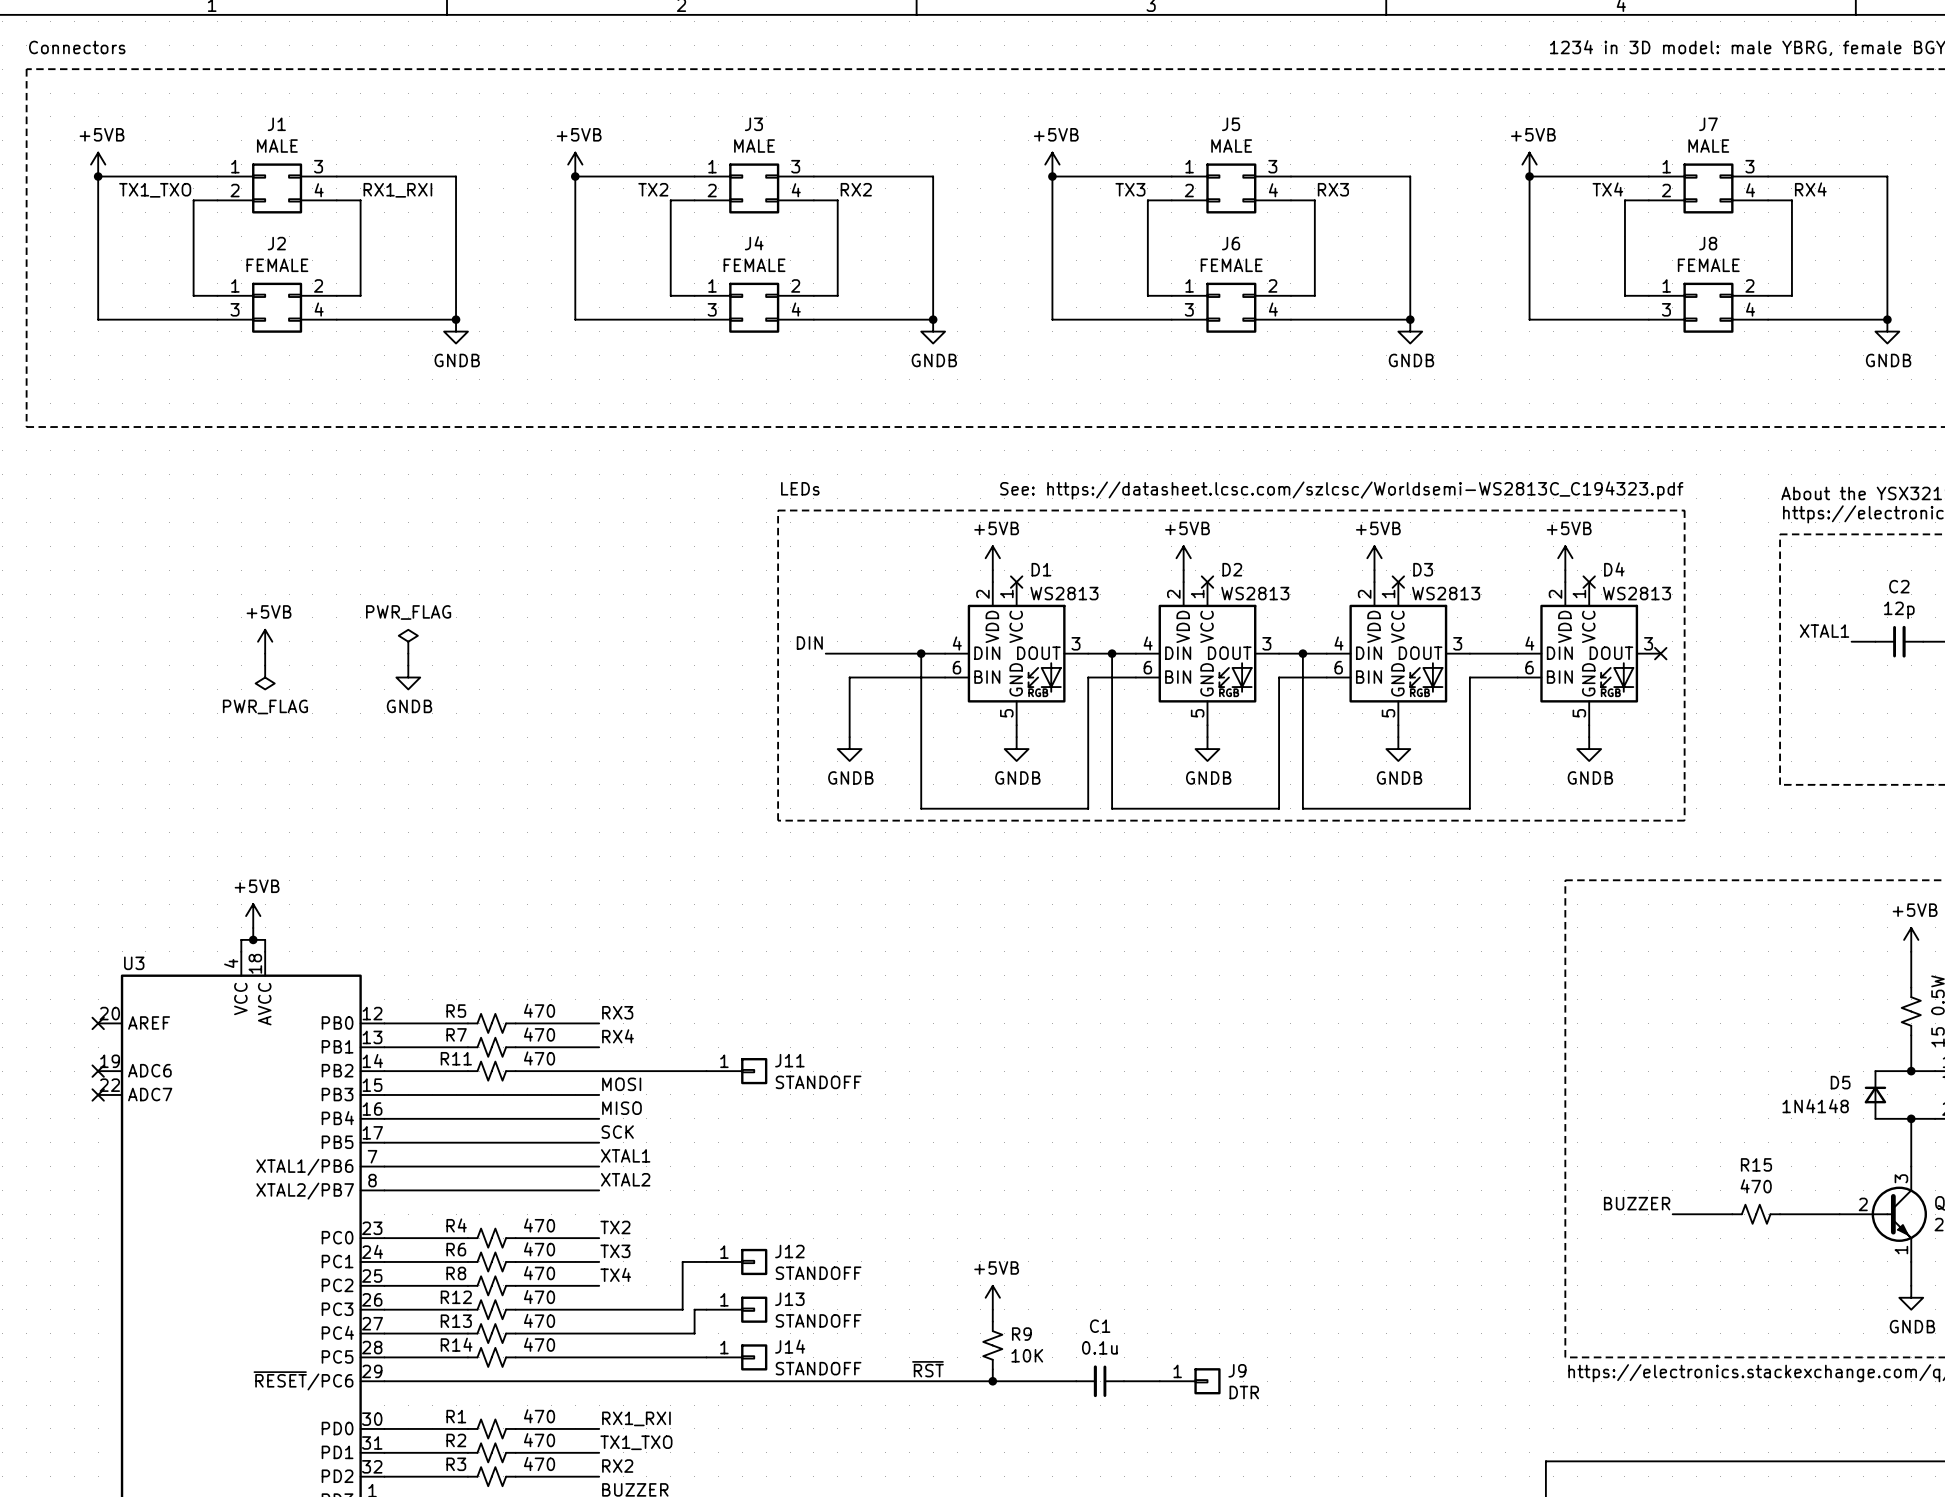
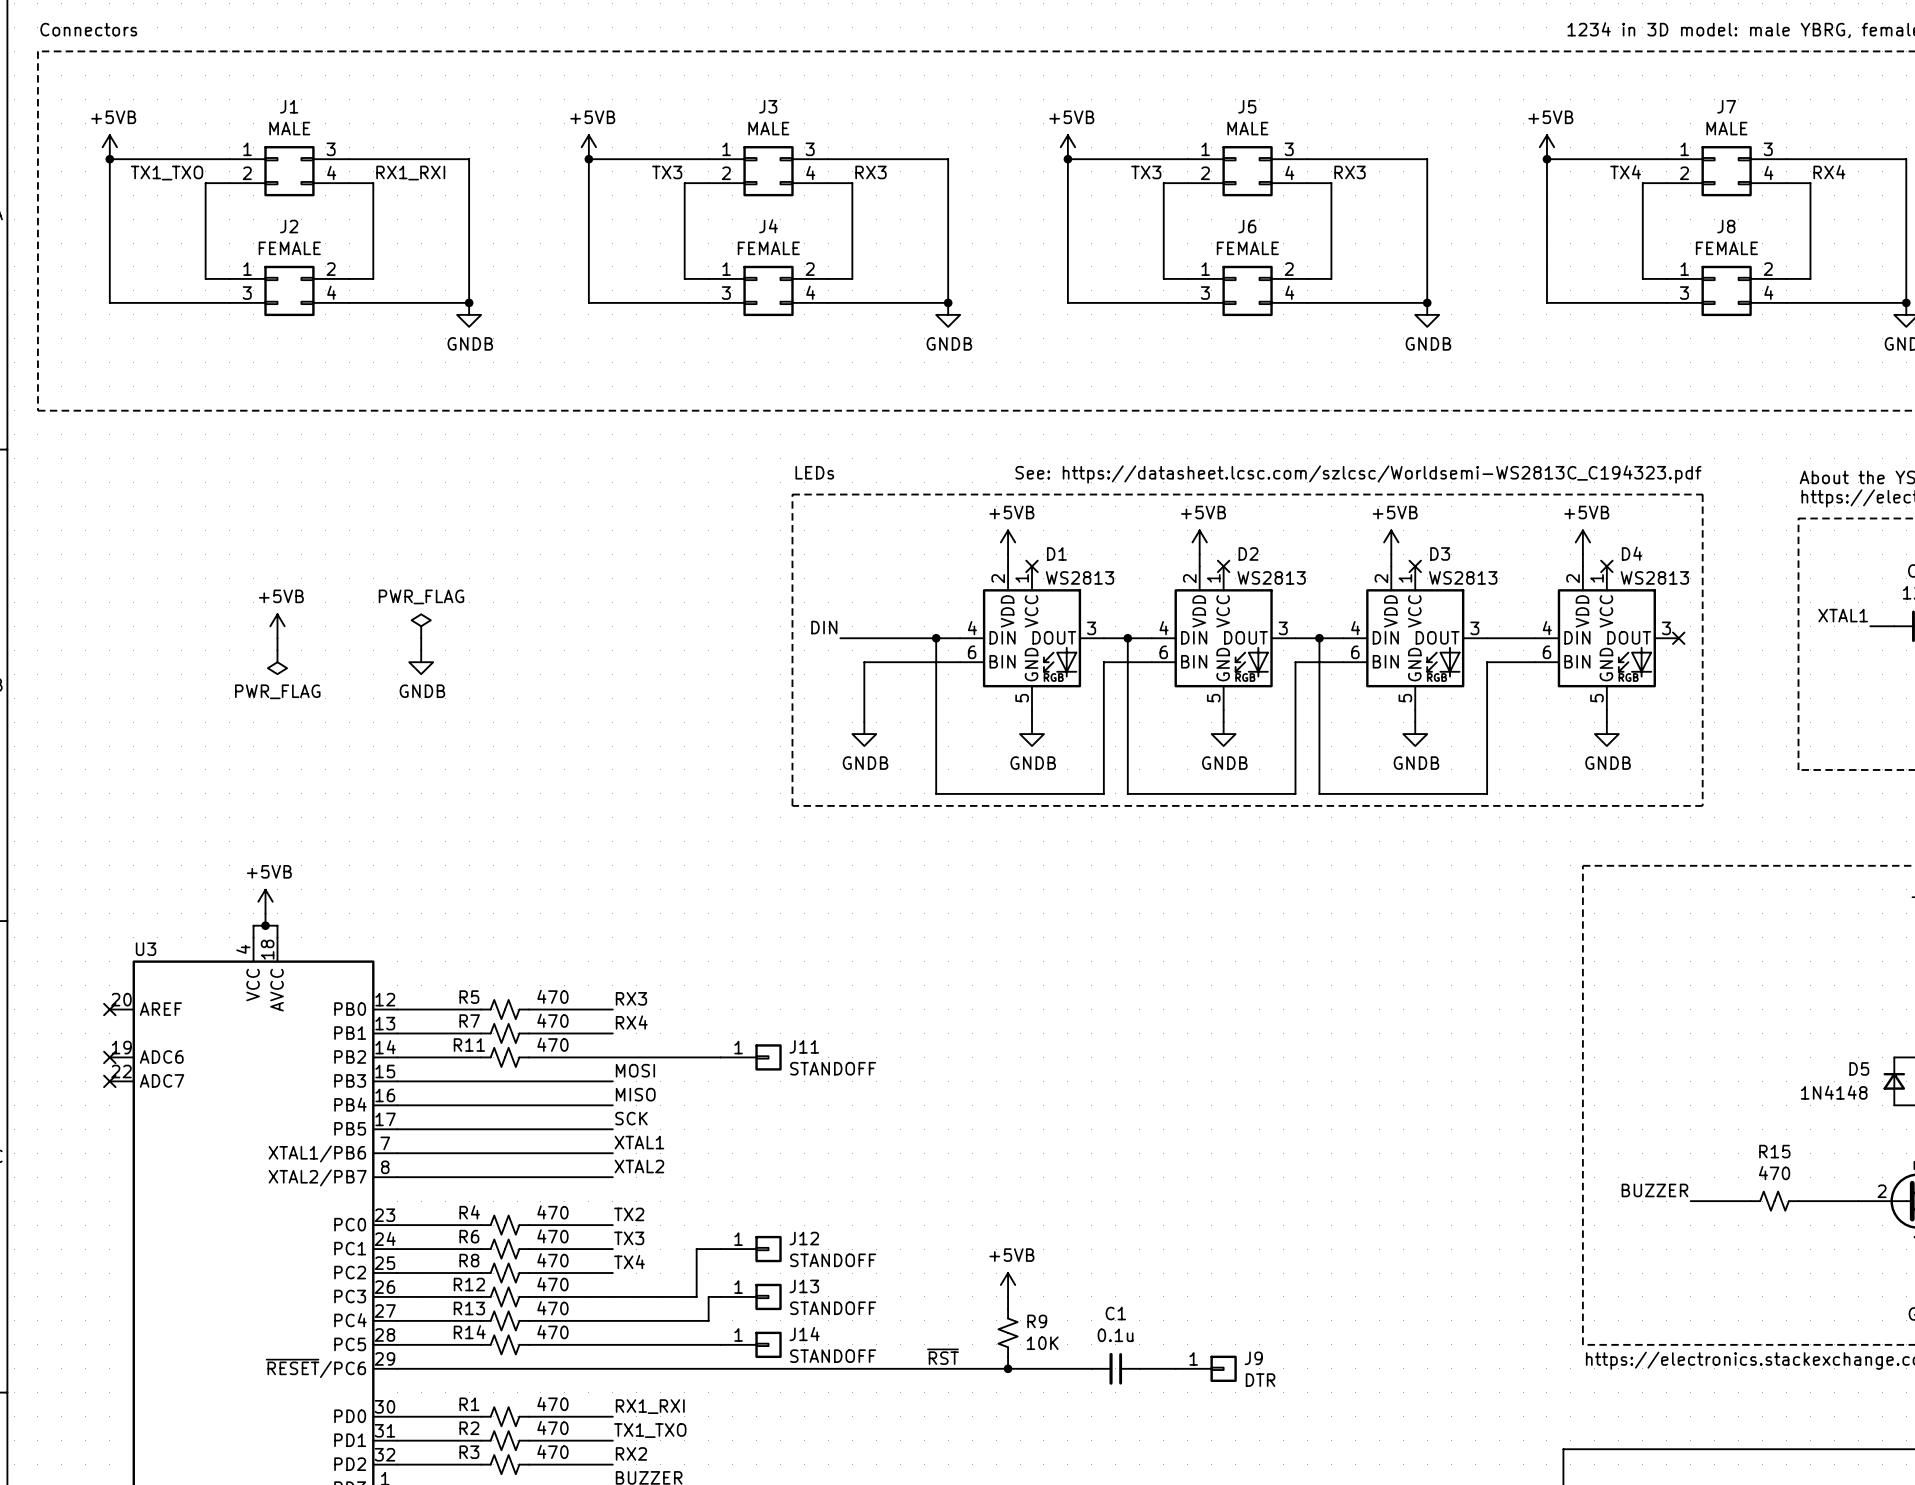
label: TX2 (653, 189) -> TX3 (667, 172)
label: RX2 (856, 189) -> RX3 (870, 172)

